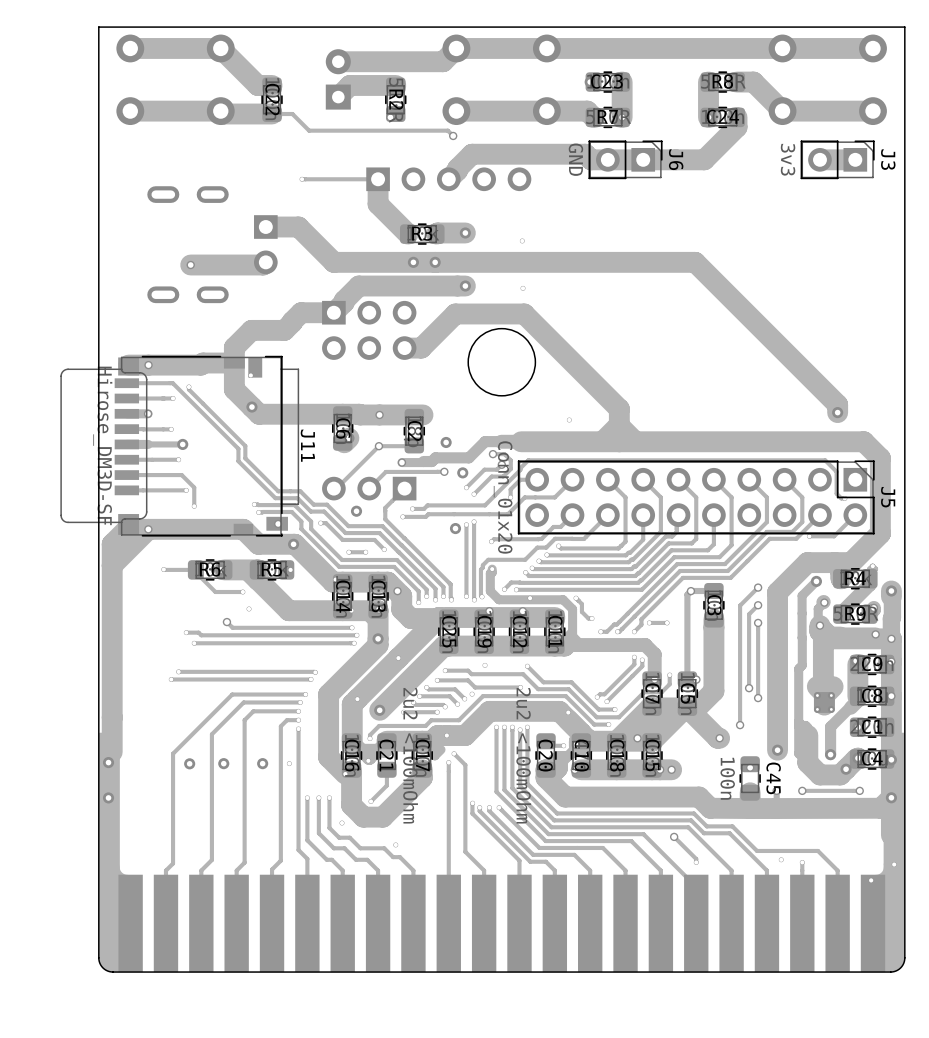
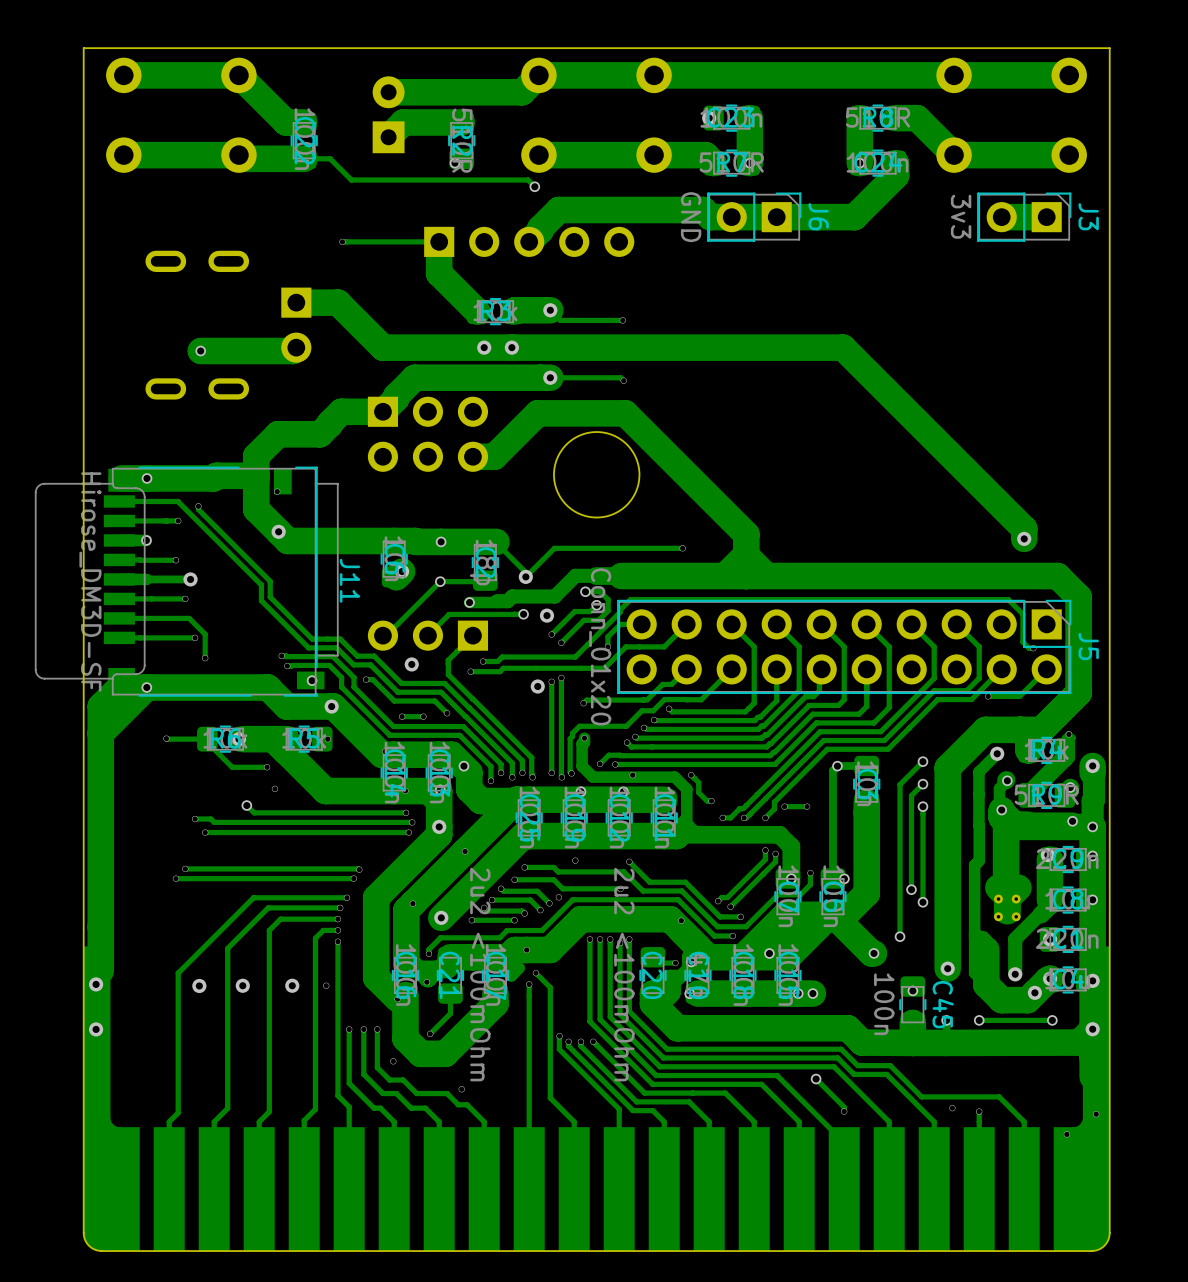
track: none -> (550, 310) (560, 320) (622, 320)
track: none -> (550, 377) (620, 377) (623, 380)
track: none -> (485, 544) (497, 544) (525, 572) (525, 576) (554, 548) (682, 548)

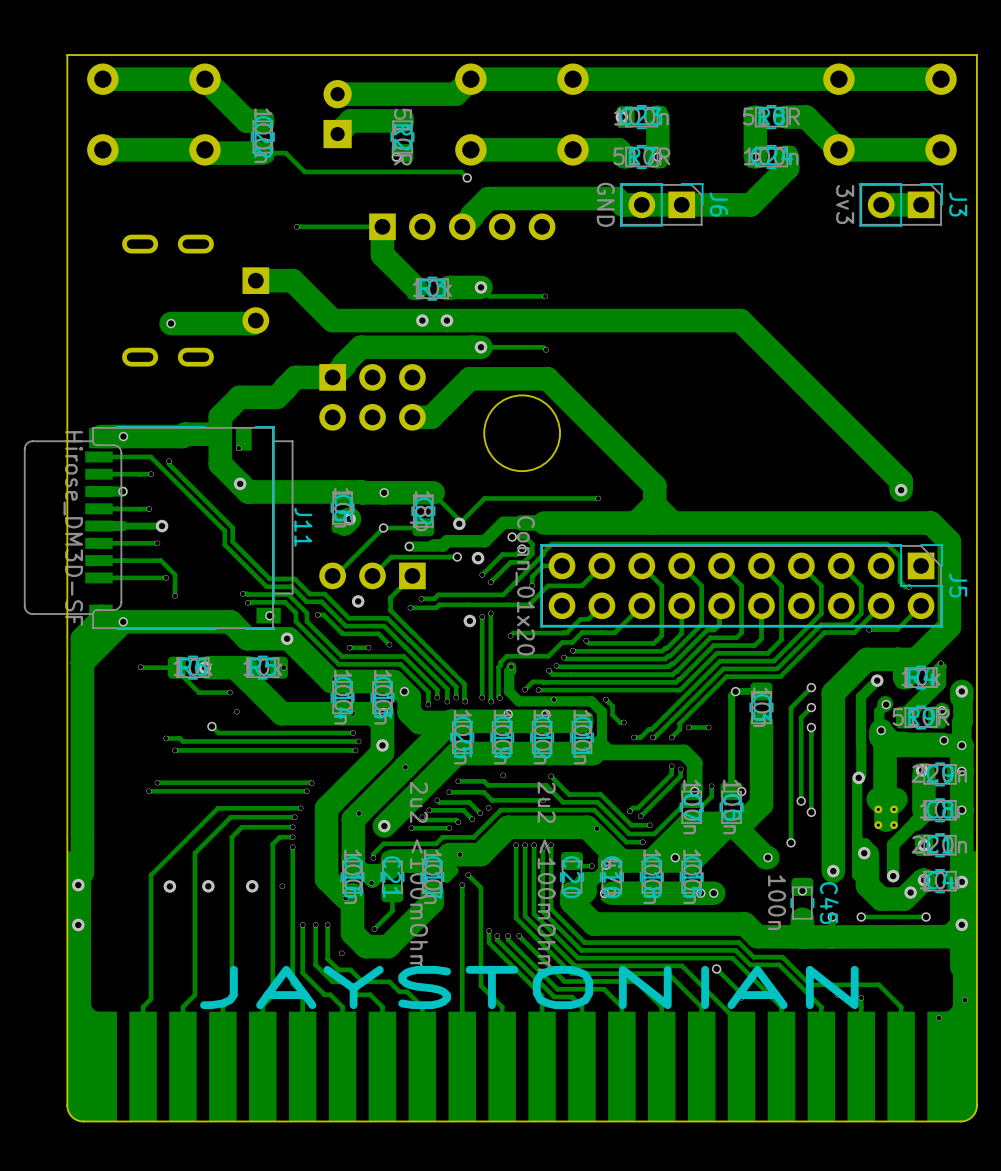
via: none -> (858, 777)
via: none -> (864, 853)
text: none -> JAYSTONIAN (529, 987)

